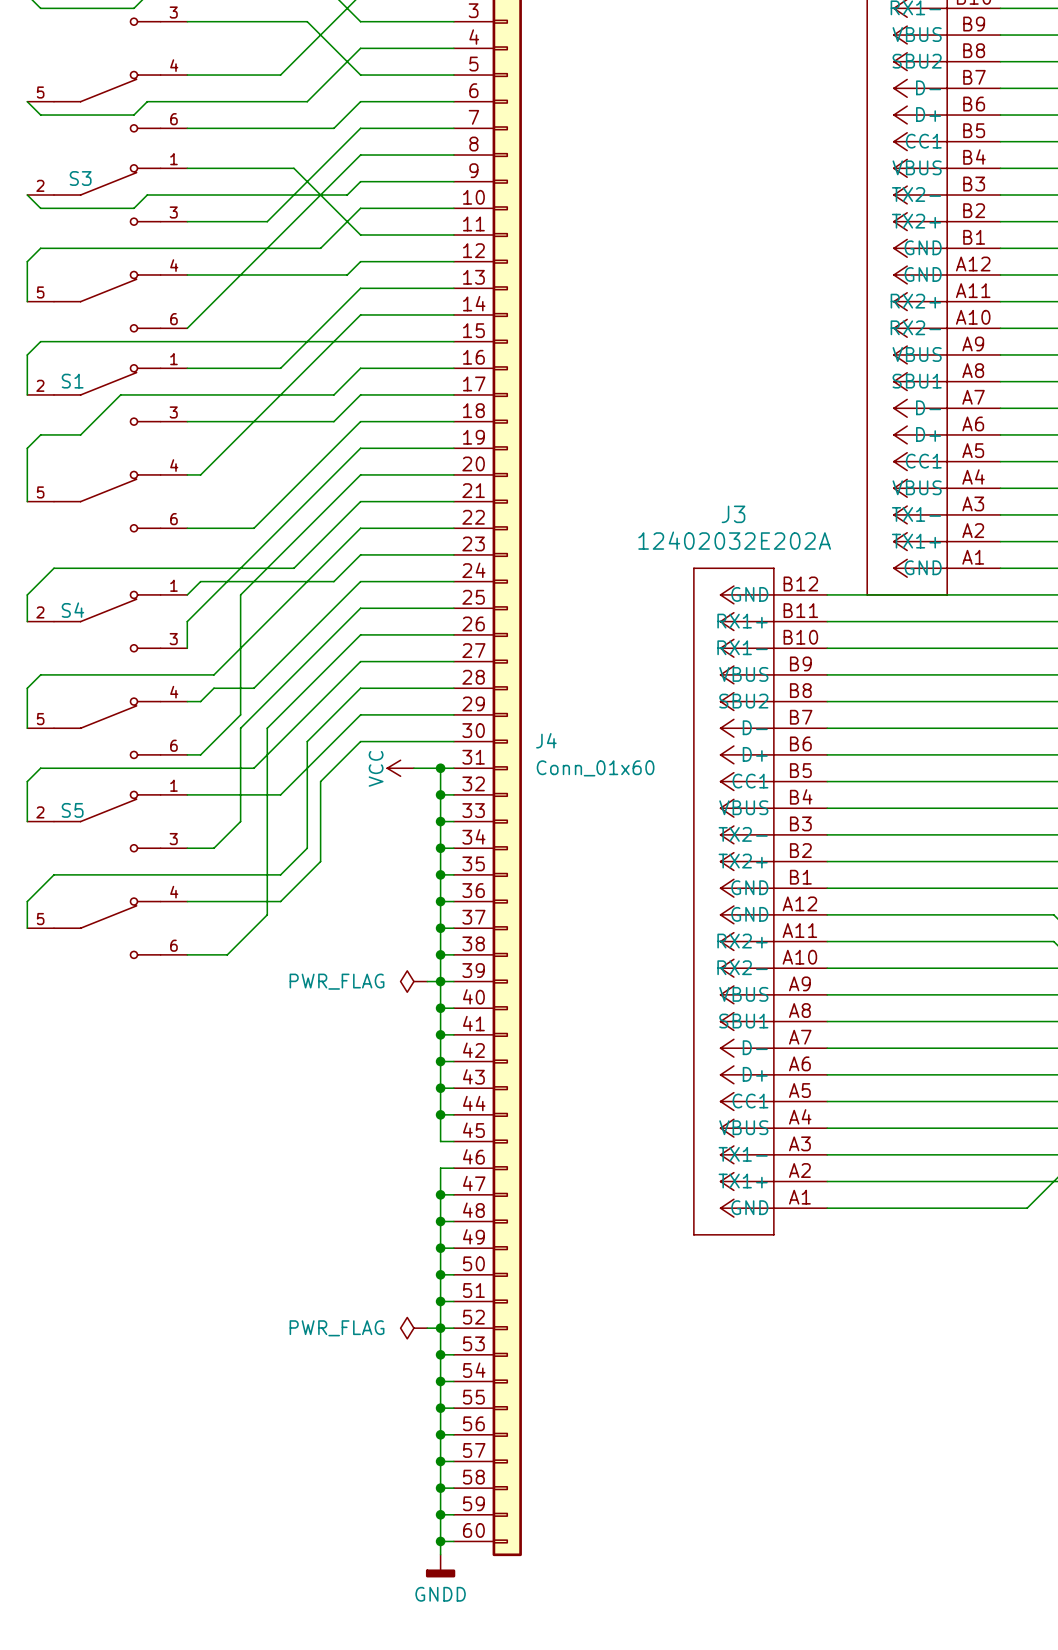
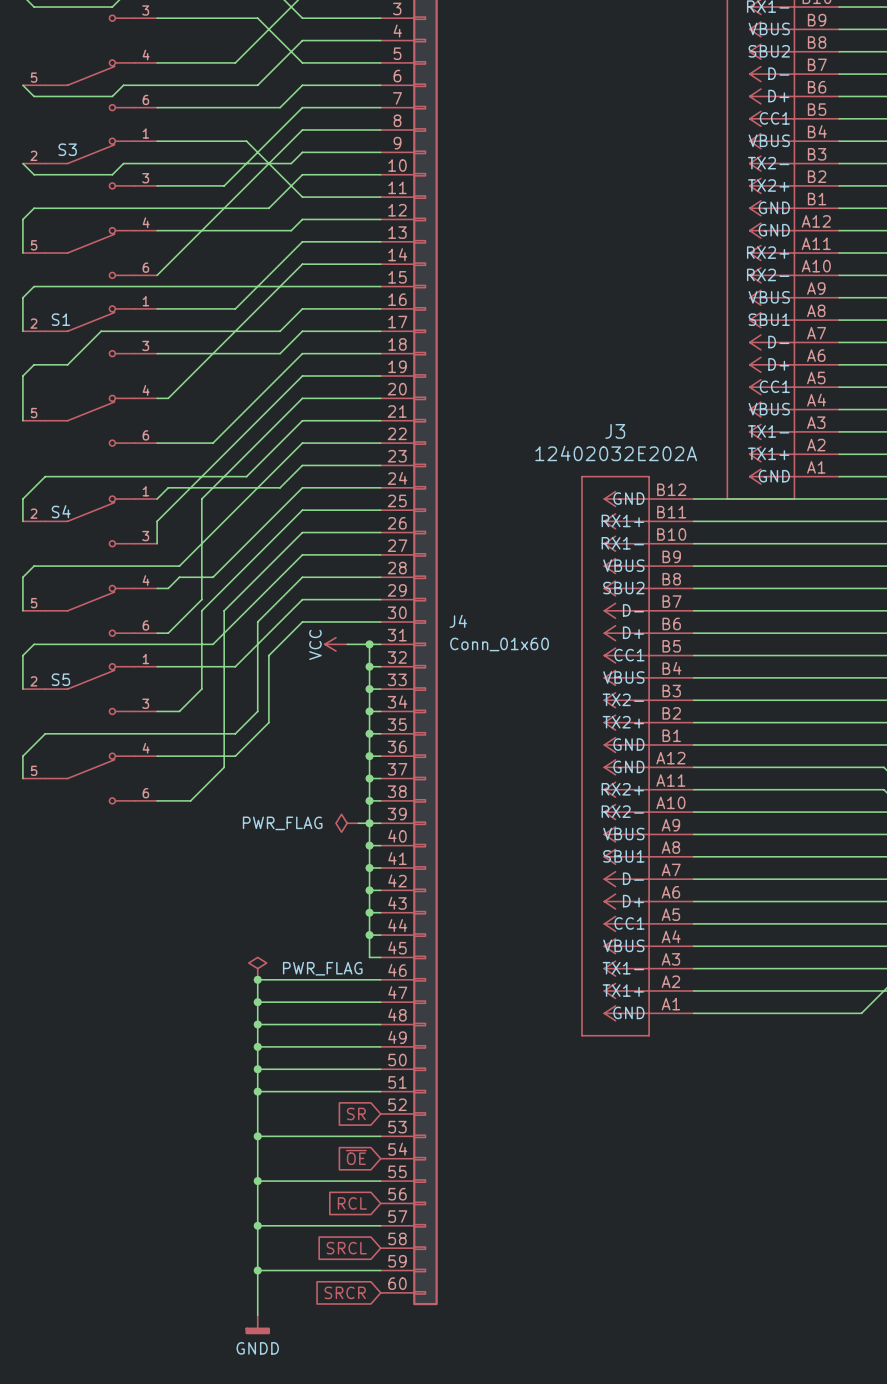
junction: none -> (257, 979)
wire: (440, 1168) (440, 1554) -> (369, 979) (257, 979) (257, 1315)
wire: none -> (257, 1002) (369, 1002)
junction: none -> (257, 1002)
junction: (440, 1194) -> none
wire: none -> (257, 1024) (369, 1024)
junction: none -> (257, 1024)
junction: (440, 1221) -> none
wire: none -> (257, 1046) (369, 1046)
junction: none -> (257, 1046)
junction: (440, 1248) -> none
wire: none -> (257, 1069) (369, 1069)
junction: none -> (257, 1069)
junction: (440, 1274) -> none
wire: none -> (257, 1091) (369, 1091)
junction: none -> (257, 1091)
junction: (440, 1301) -> none
power symbol text position: PWR_FLAG (337, 1328) -> PWR_FLAG (322, 968)
power symbol rotation: 0° (413, 1328) -> 90° clockwise (257, 968)
power symbol position: PWR_FLAG (413, 1328) -> PWR_FLAG (257, 968)
global label: none -> SR (356, 1113)
wire: (427, 1328) (453, 1328) -> none
junction: (440, 1328) -> none
wire: none -> (257, 1136) (369, 1136)
junction: none -> (257, 1136)
junction: (440, 1354) -> none
global label: none -> ~{OE} (356, 1157)
wire: (440, 1381) (453, 1381) -> none
junction: (440, 1381) -> none
wire: none -> (257, 1181) (369, 1181)
junction: none -> (257, 1181)
junction: (440, 1408) -> none
global label: none -> RCL (352, 1203)
wire: (440, 1434) (453, 1434) -> none
junction: (440, 1434) -> none
wire: none -> (257, 1225) (369, 1225)
junction: none -> (257, 1225)
junction: (440, 1461) -> none
global label: none -> SRCL (346, 1248)
wire: (440, 1488) (453, 1488) -> none
junction: (440, 1488) -> none
wire: none -> (257, 1270) (369, 1270)
junction: none -> (257, 1270)
junction: (440, 1514) -> none
global label: none -> SRCR (345, 1292)
wire: (440, 1541) (453, 1541) -> none
junction: (440, 1541) -> none
power symbol position: GNDD (440, 1566) -> GNDD (257, 1324)

